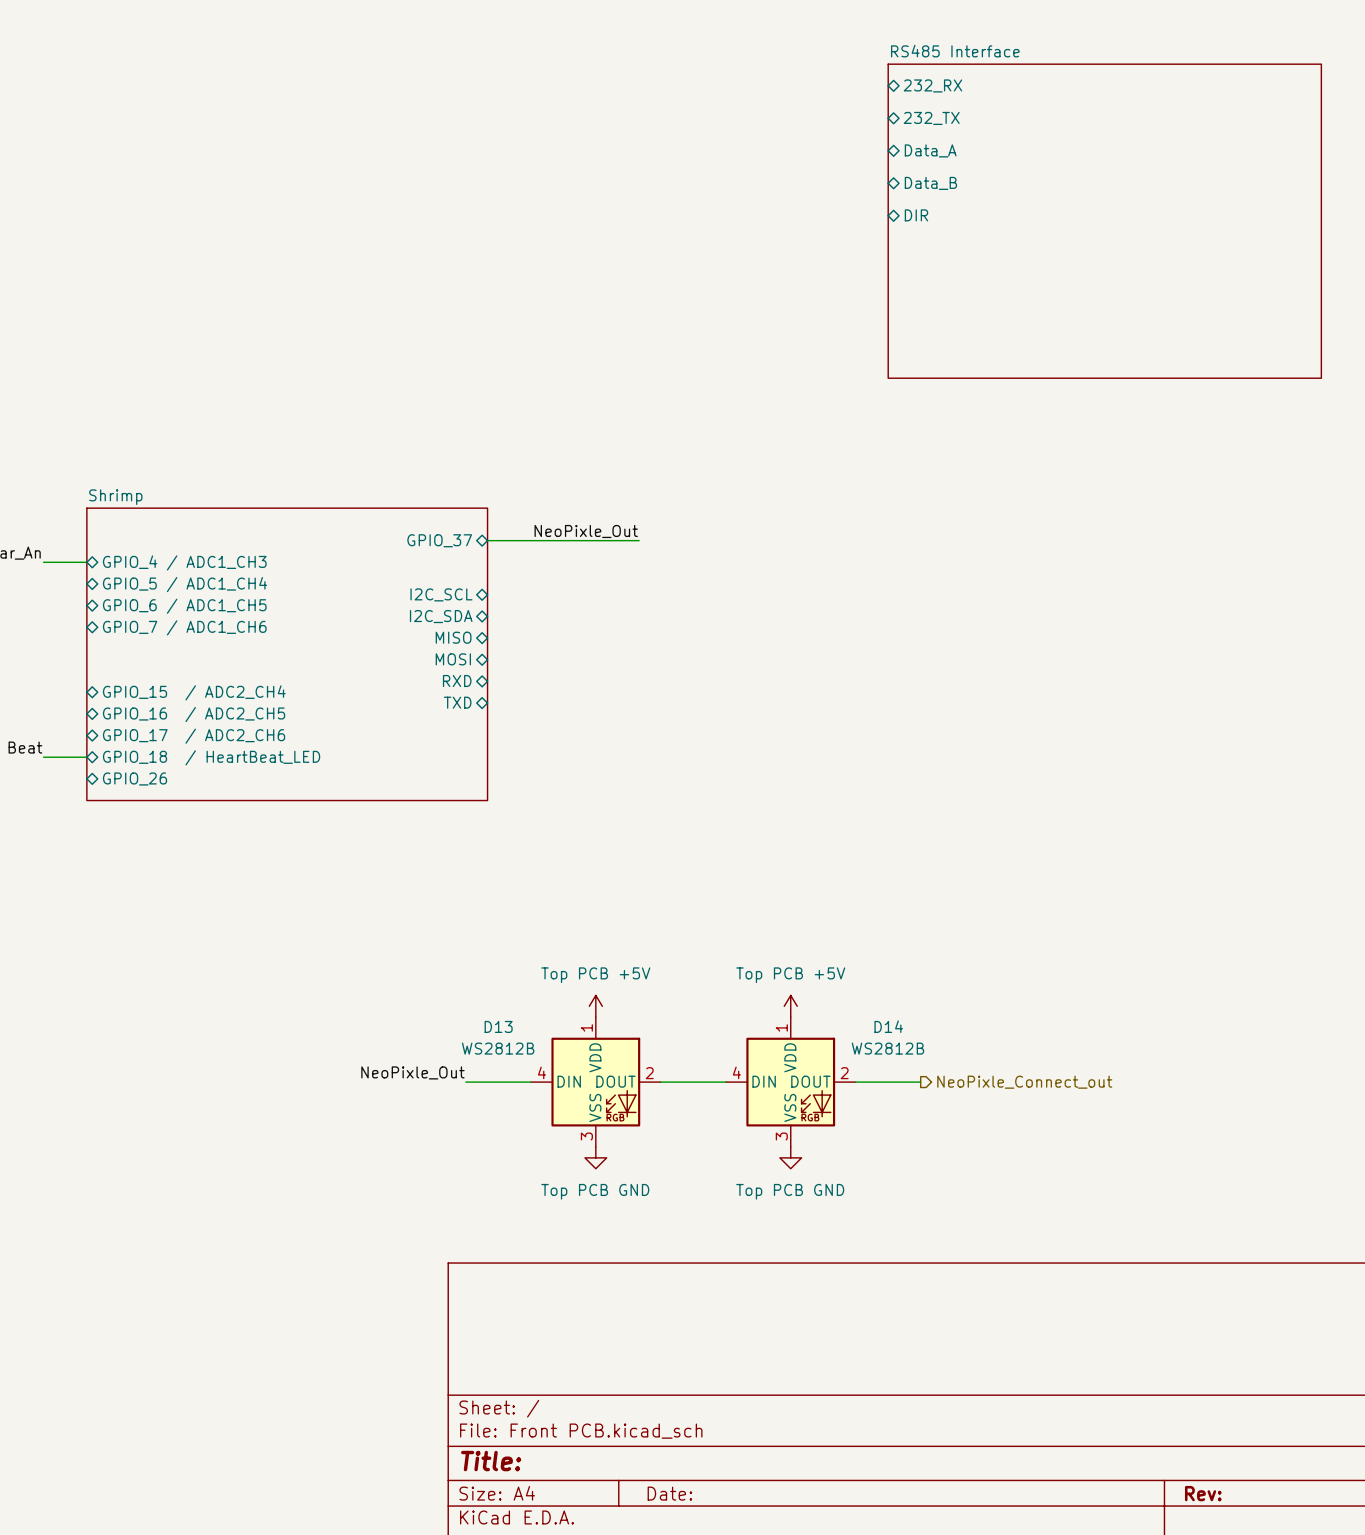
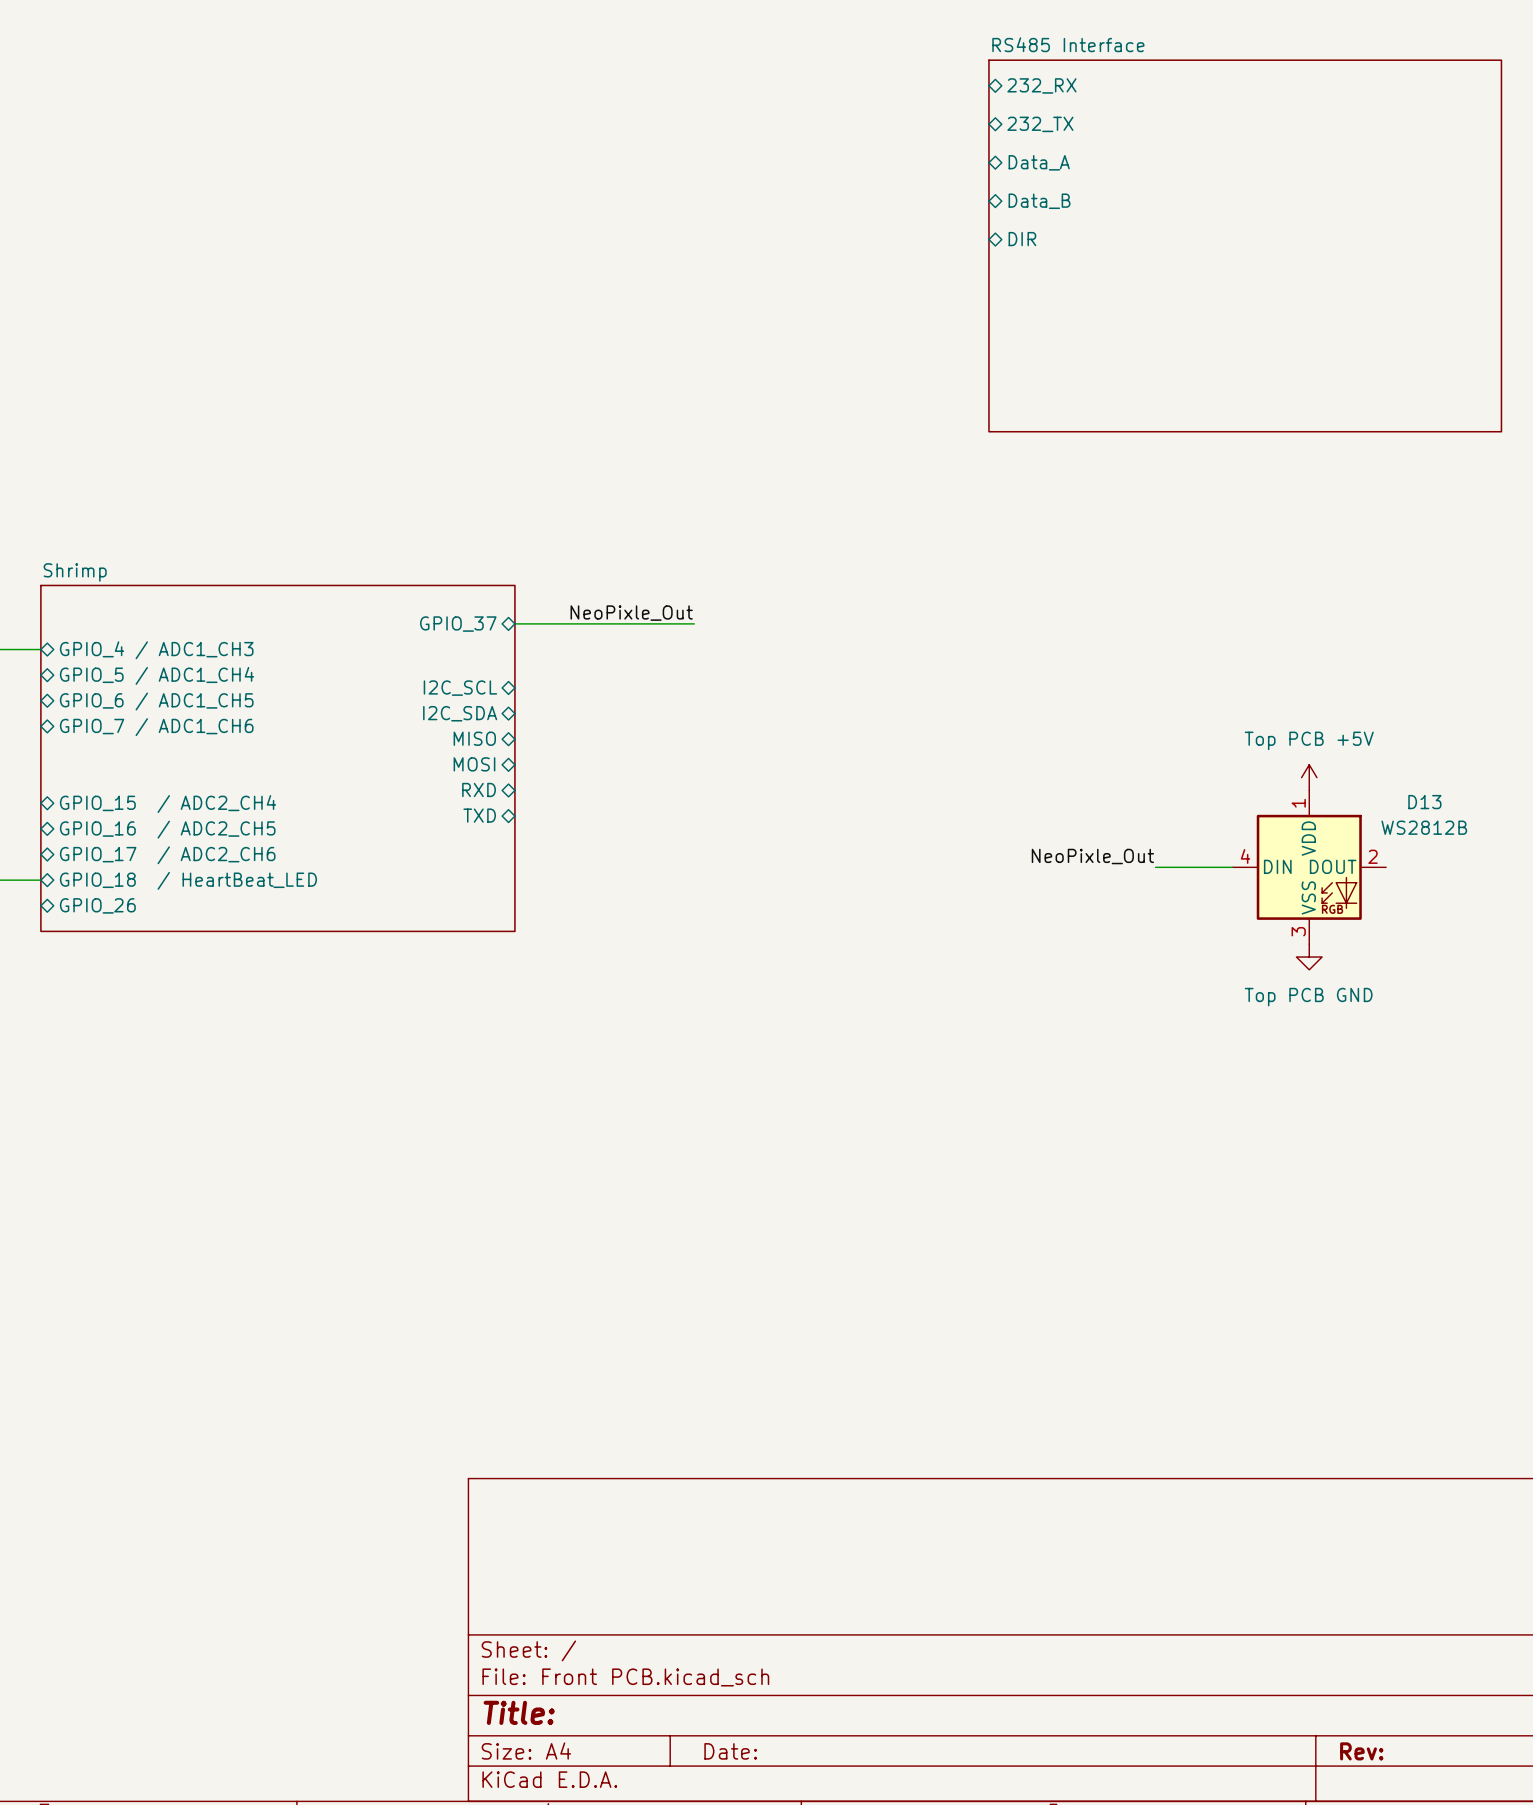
power symbol: none -> Top PCB +5V (1309, 777)
label: none -> NeoPixle_Out (1092, 856)
wire: none -> (1155, 867) (1232, 867)
power symbol: none -> Top PCB GND (1309, 957)
power symbol: Top PCB +5V (595, 1006) -> none
power symbol: Top PCB +5V (790, 1006) -> none
D13 name position: D13 (498, 1026) -> D13 (1424, 802)
D13 value position: WS2812B (498, 1048) -> WS2812B (1424, 827)
label: NeoPixle_Out (412, 1072) -> none
wire: (465, 1082) (530, 1082) -> none
D13 position: (595, 1082) -> (1309, 867)
wire: (660, 1082) (725, 1082) -> none
D14: WS2812B (790, 1082) -> none
wire: (855, 1082) (920, 1082) -> none
hierarchical label: NeoPixle_Connect_out (1024, 1082) -> none
power symbol: Top PCB GND (595, 1157) -> none
power symbol: Top PCB GND (790, 1157) -> none

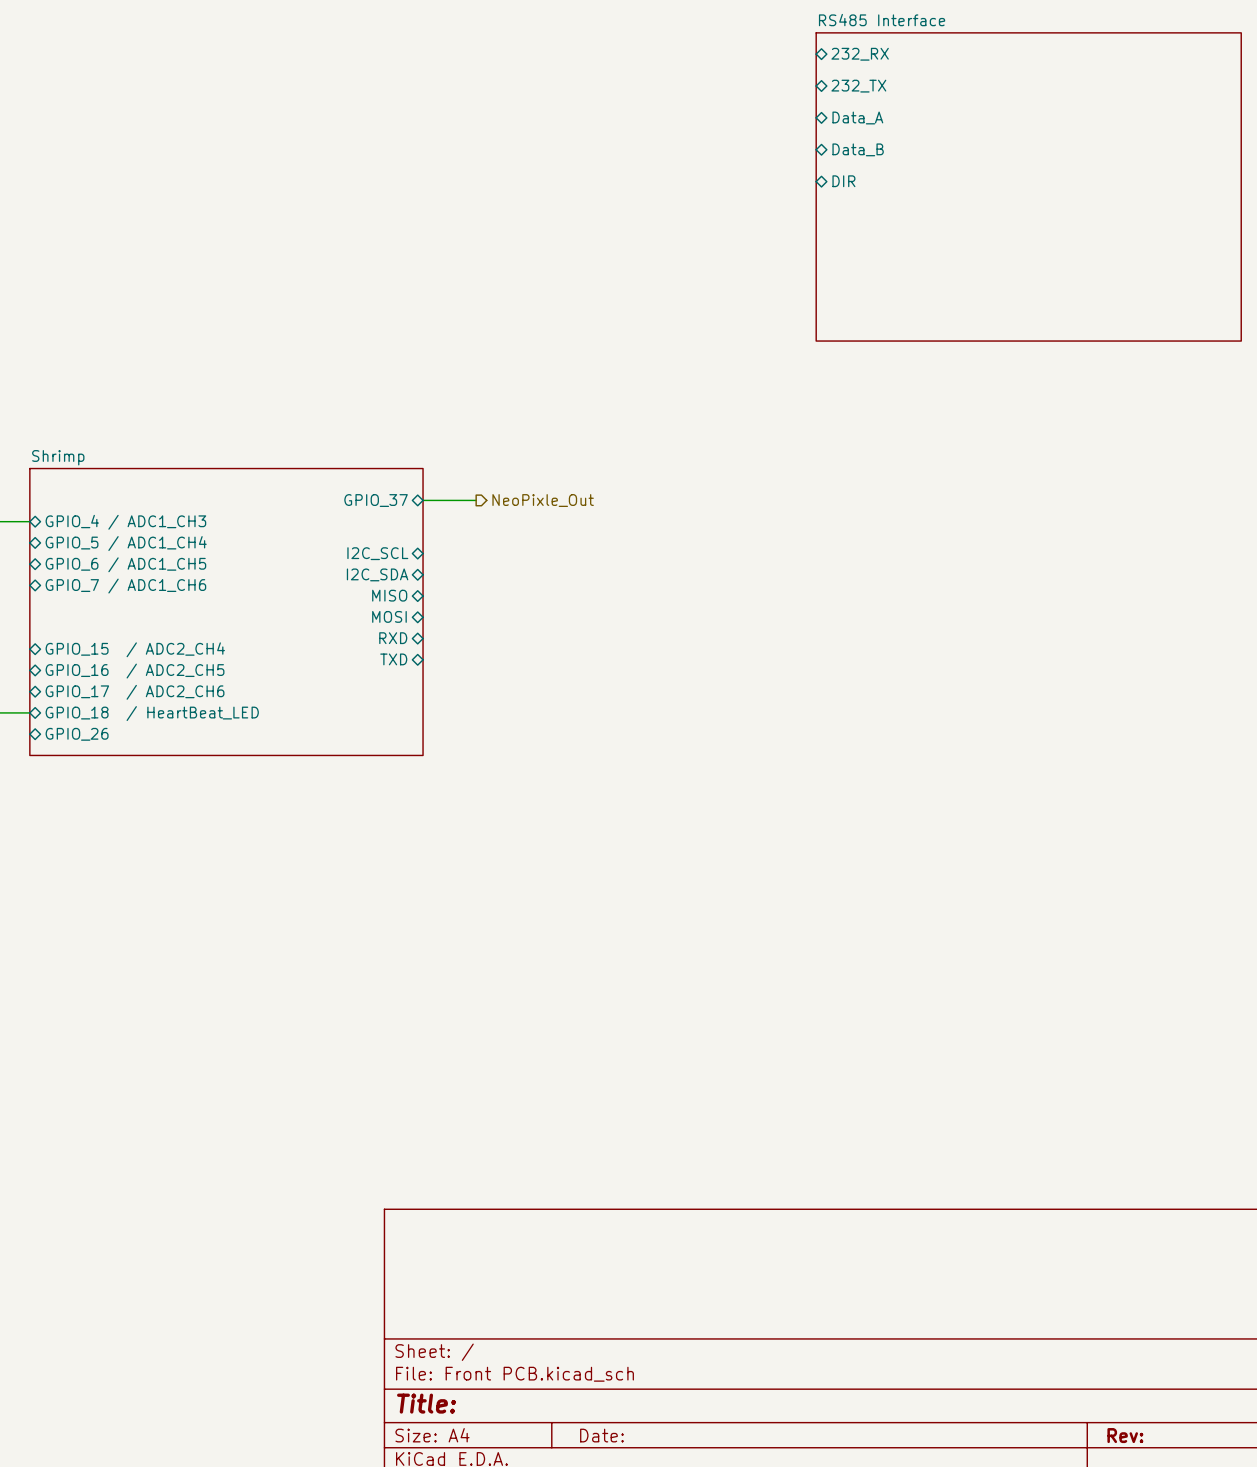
label: NeoPixle_Out (631, 613) -> none
wire: (579, 623) (694, 623) -> none
hierarchical label: none -> NeoPixle_Out (543, 500)
power symbol: Top PCB +5V (1309, 777) -> none
label: NeoPixle_Out (1092, 856) -> none
wire: (1155, 867) (1232, 867) -> none
D13: WS2812B (1309, 867) -> none
power symbol: Top PCB GND (1309, 957) -> none

